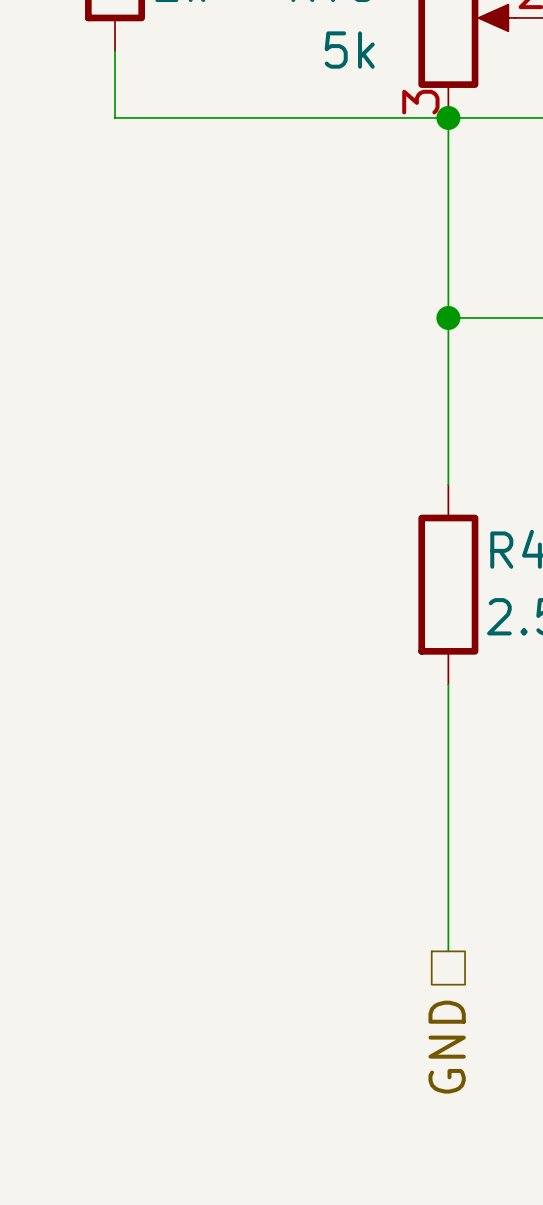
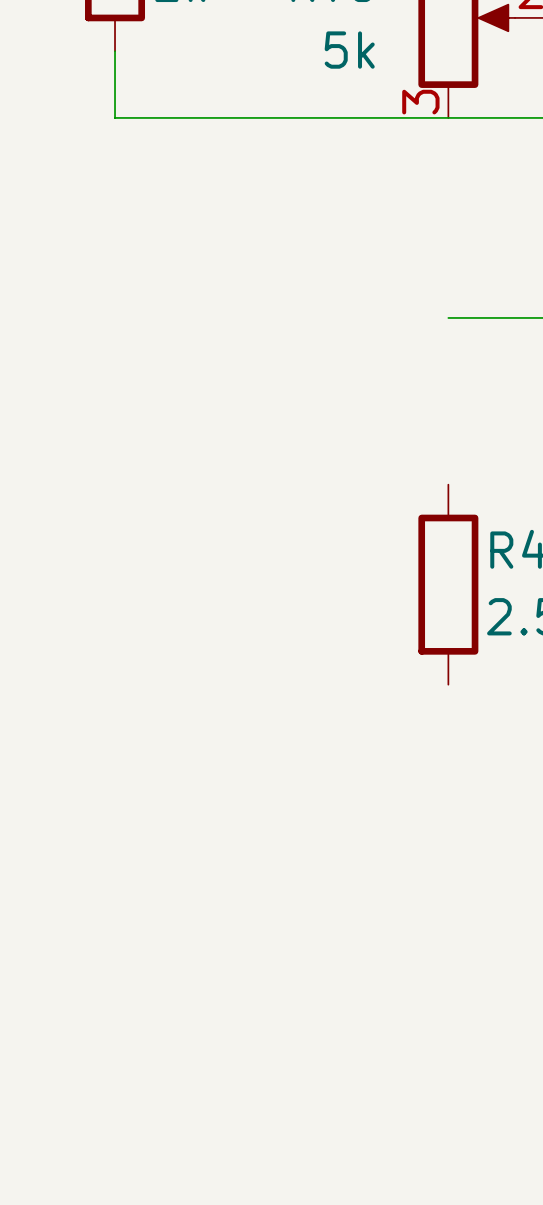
wire: (448, 117) (448, 484) -> none
junction: (448, 117) -> none
junction: (448, 317) -> none
wire: (448, 684) (448, 951) -> none
hierarchical label: GND (447, 1047) -> none

